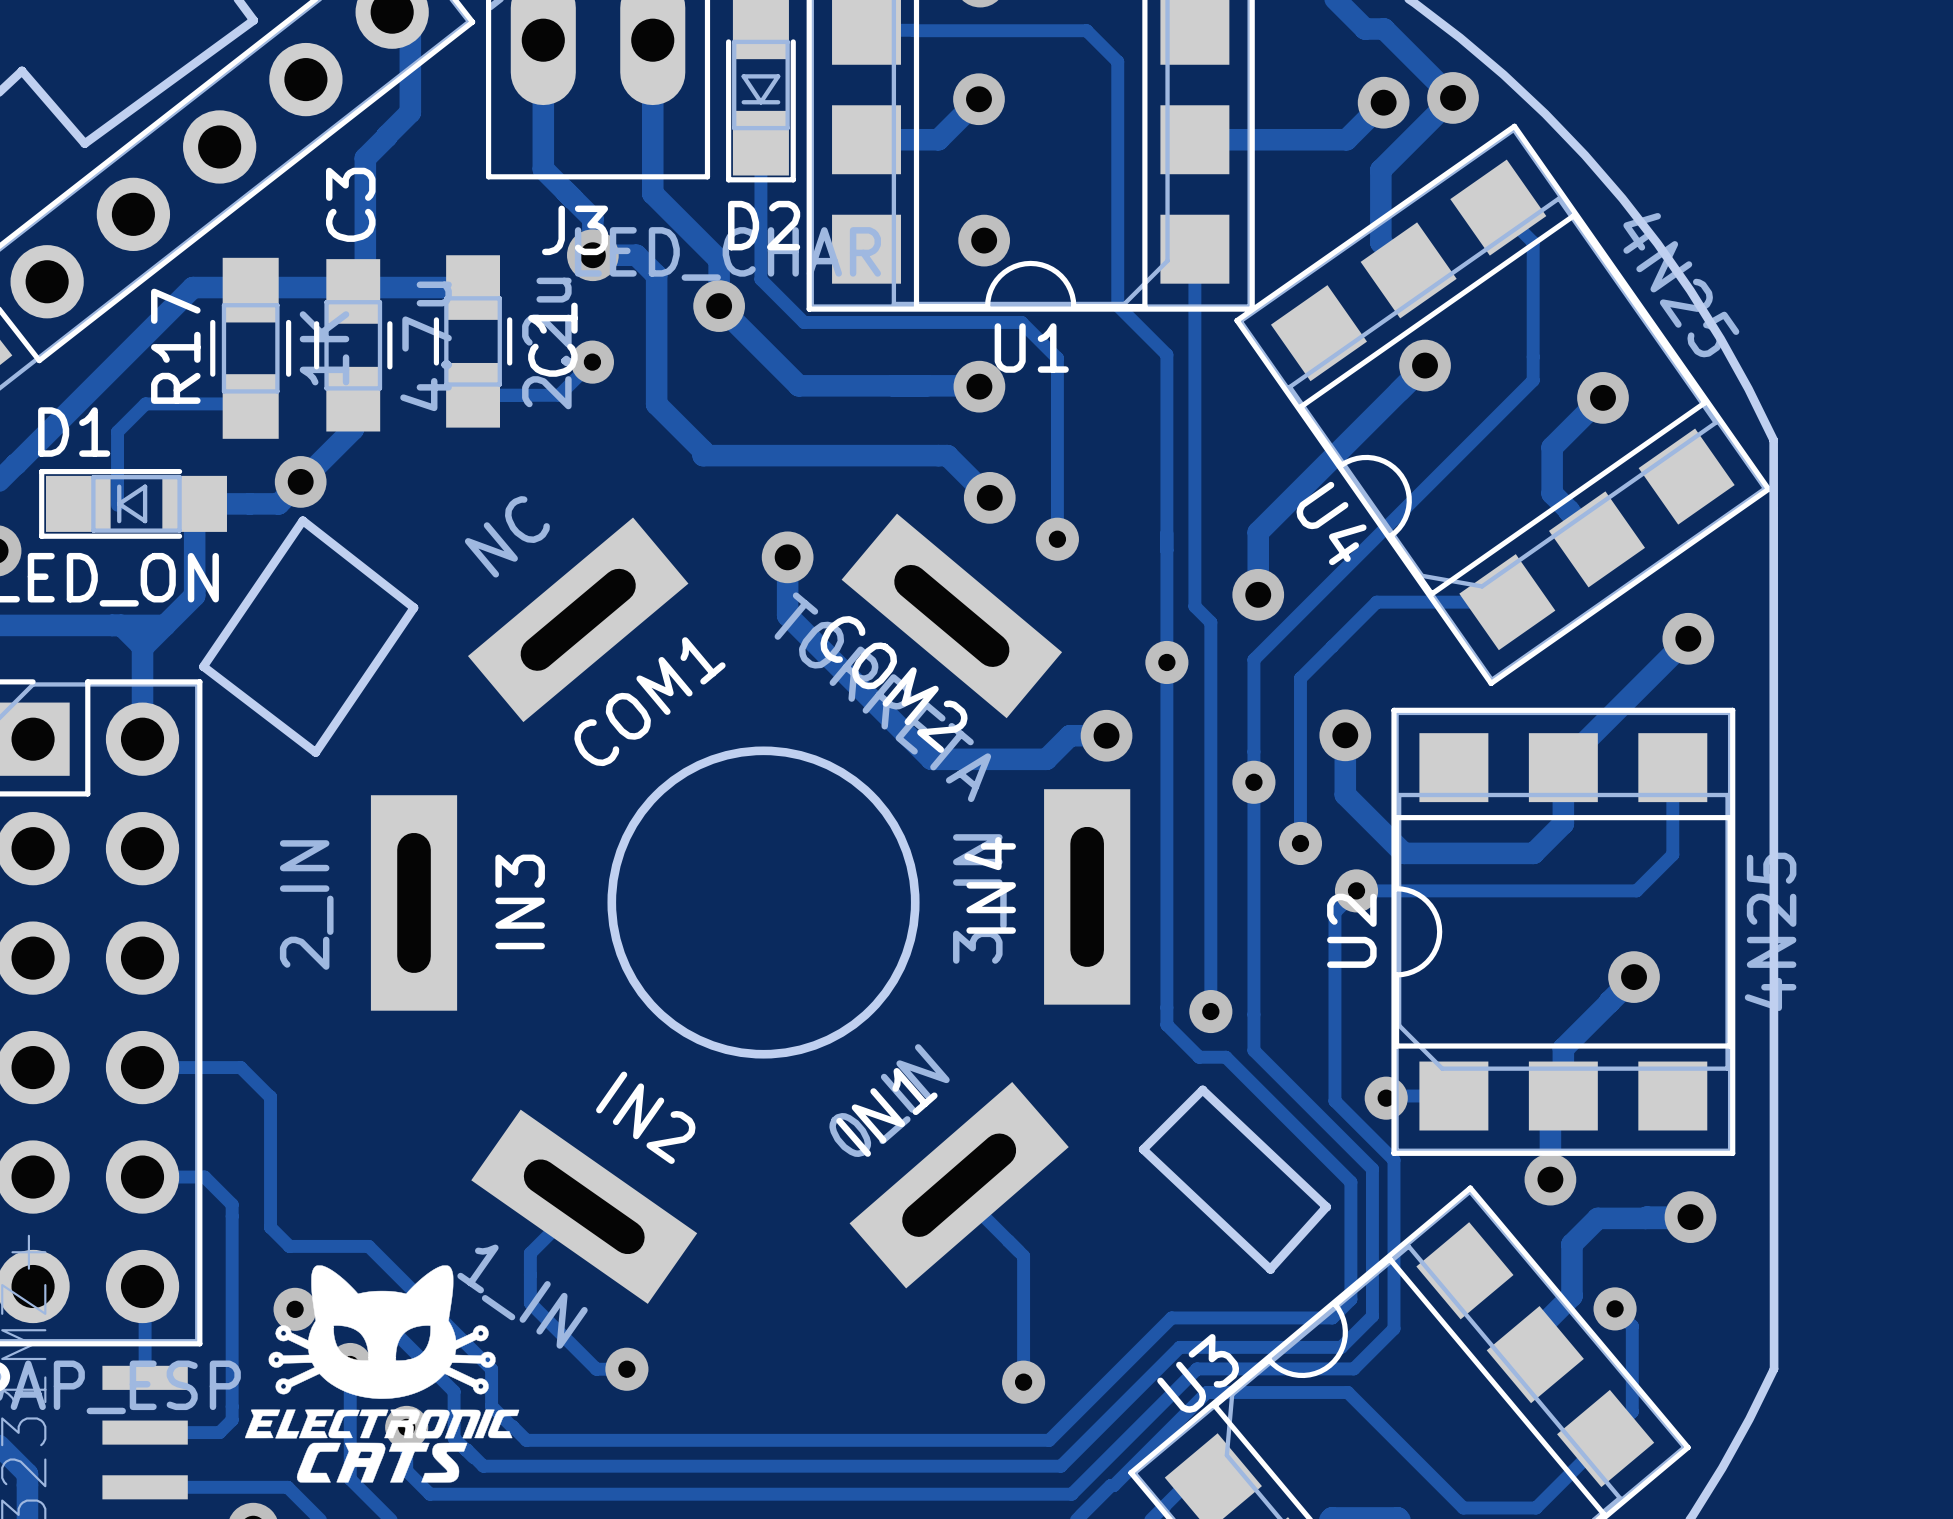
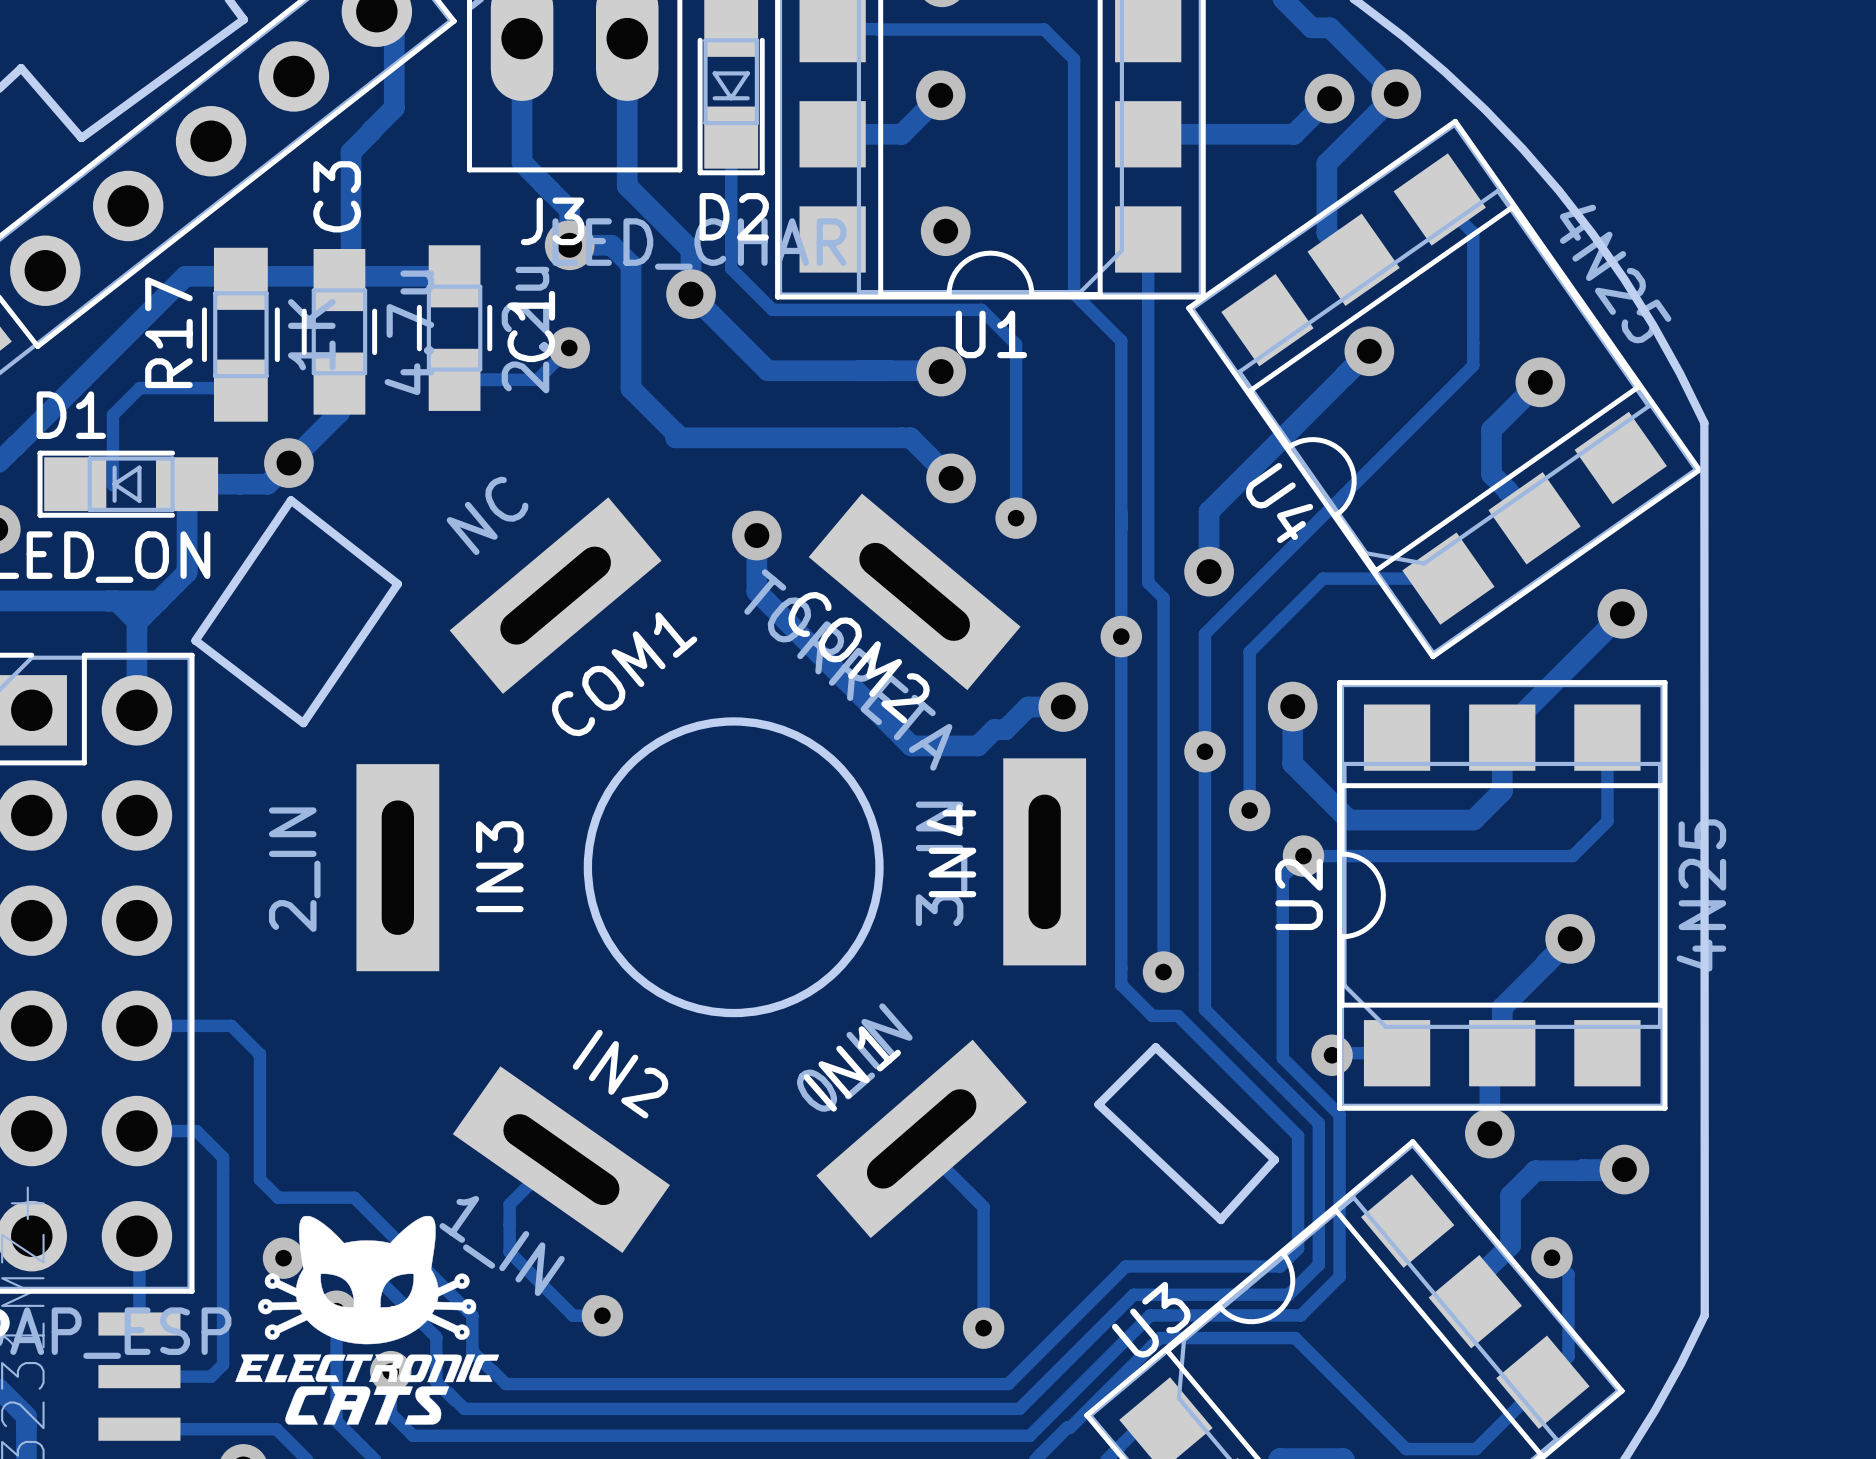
track: (931, 759) (1034, 759) -> (895, 729) (911, 745) (978, 745) (994, 729)

